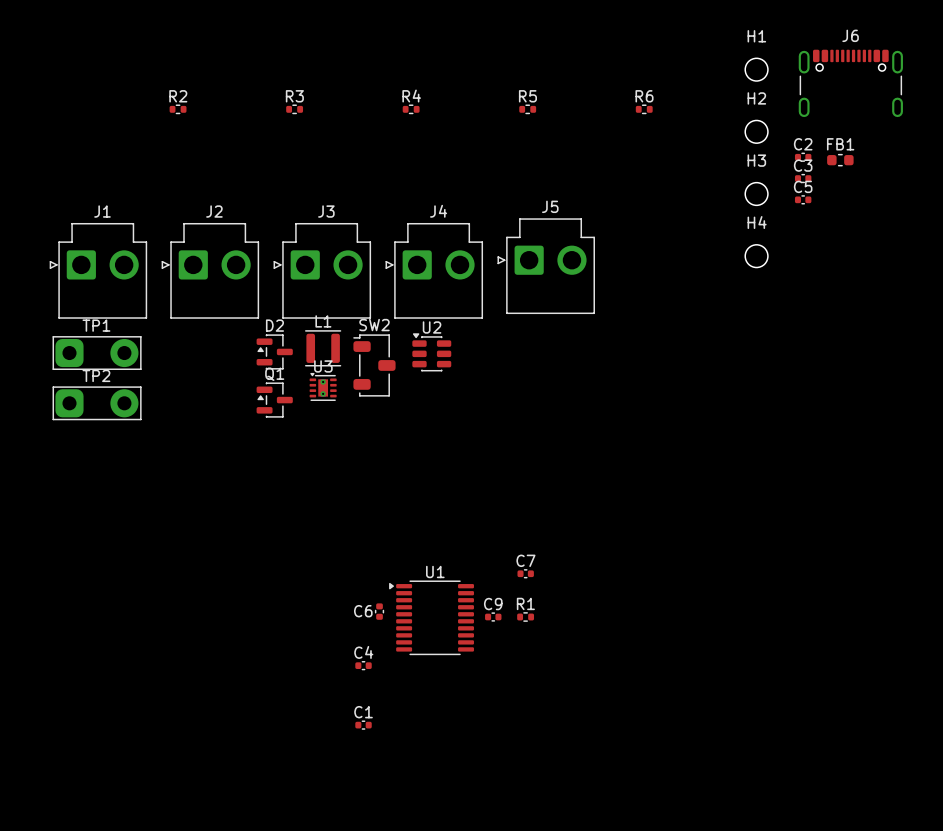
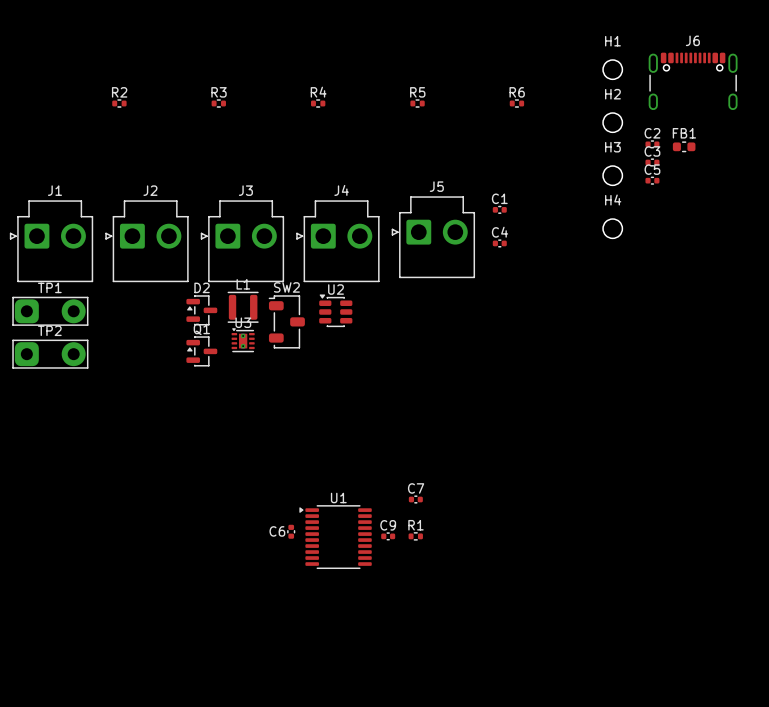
C4 position: (363, 665) -> (499, 243)
C1 position: (363, 725) -> (499, 209)

